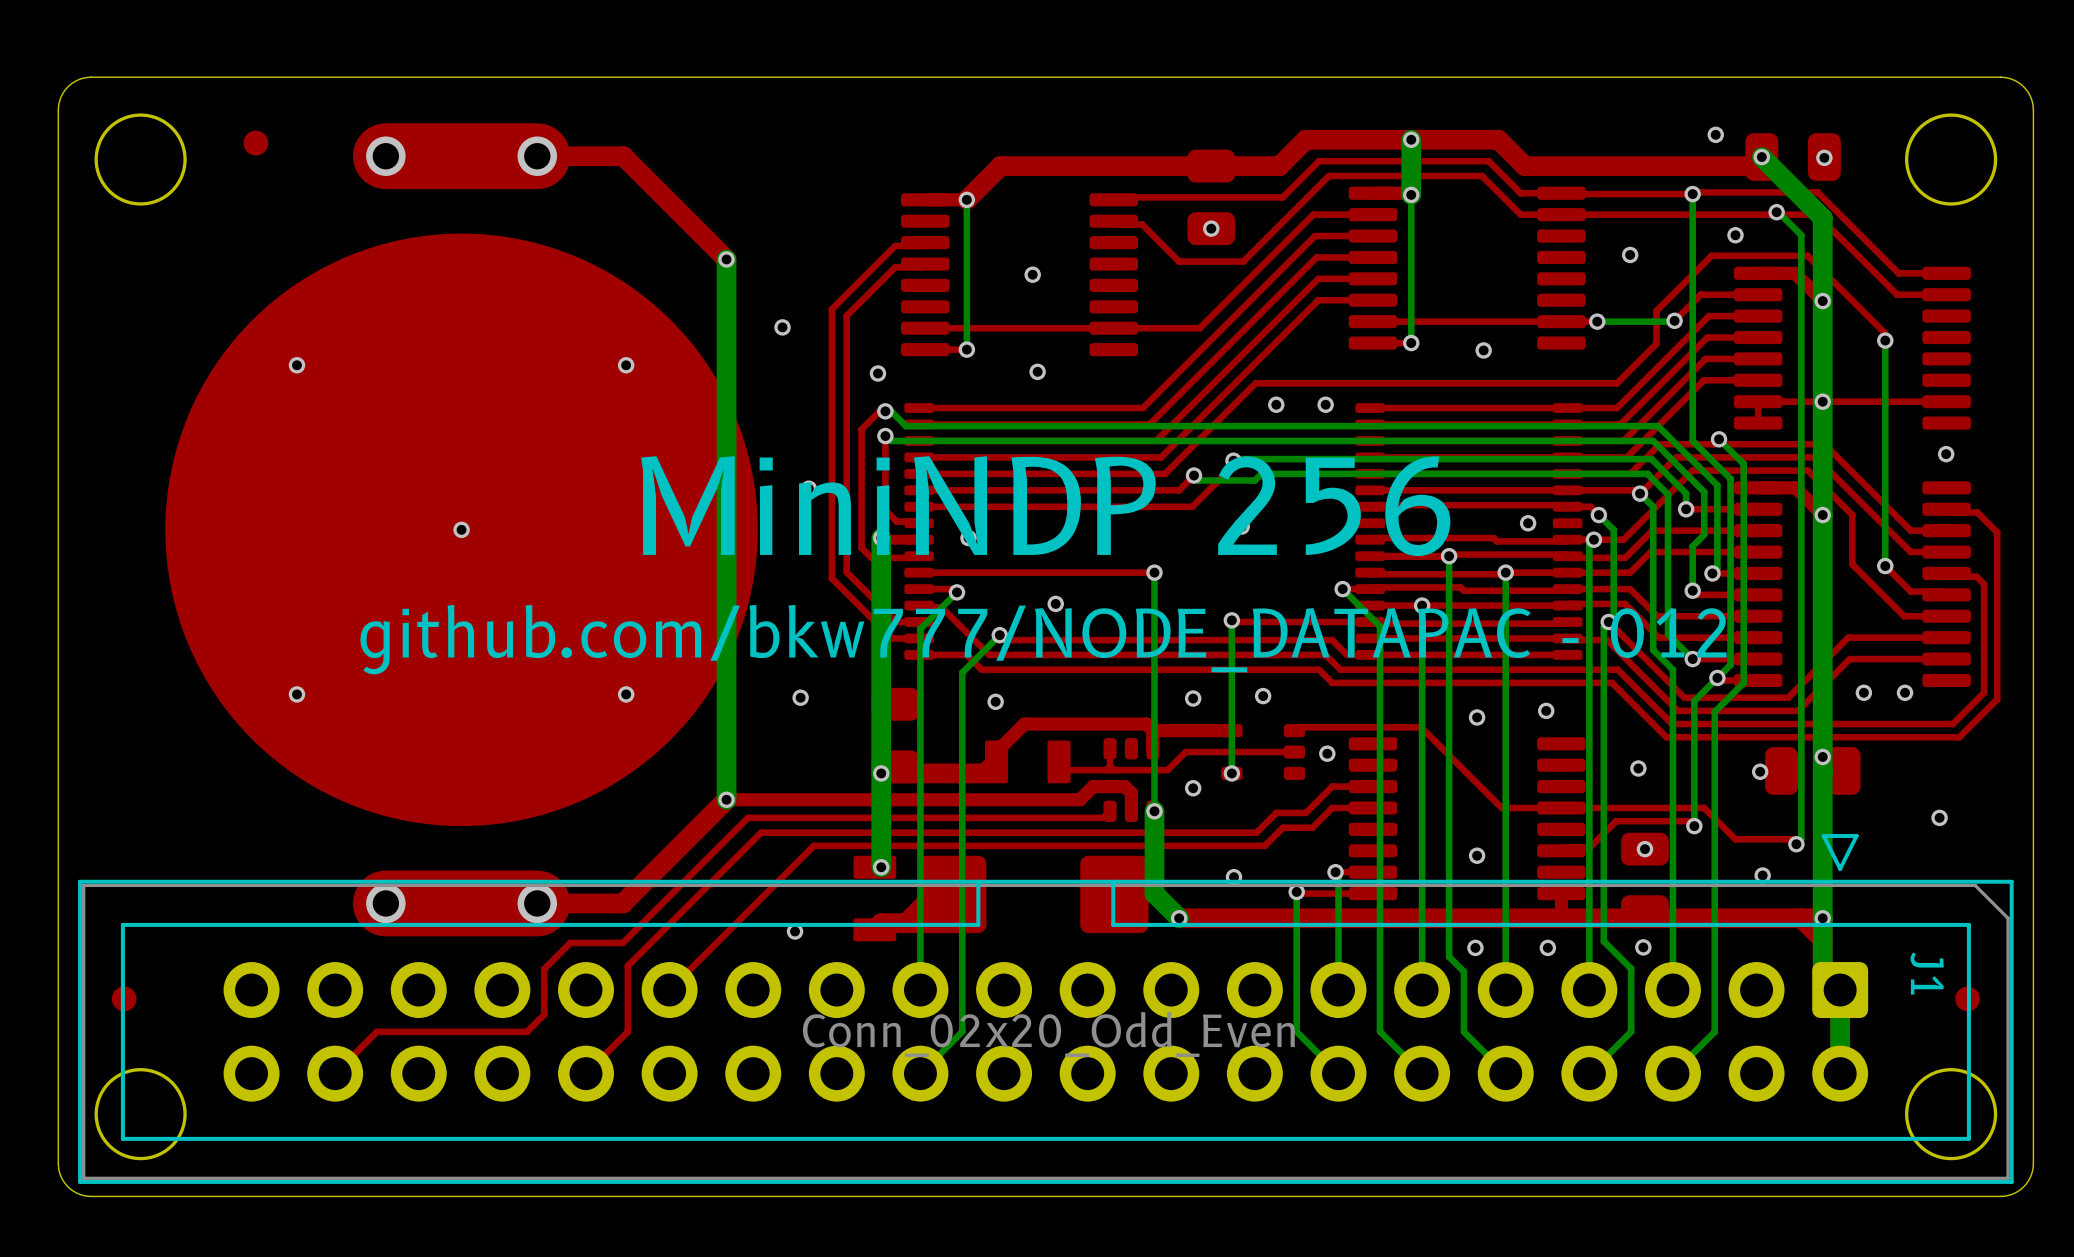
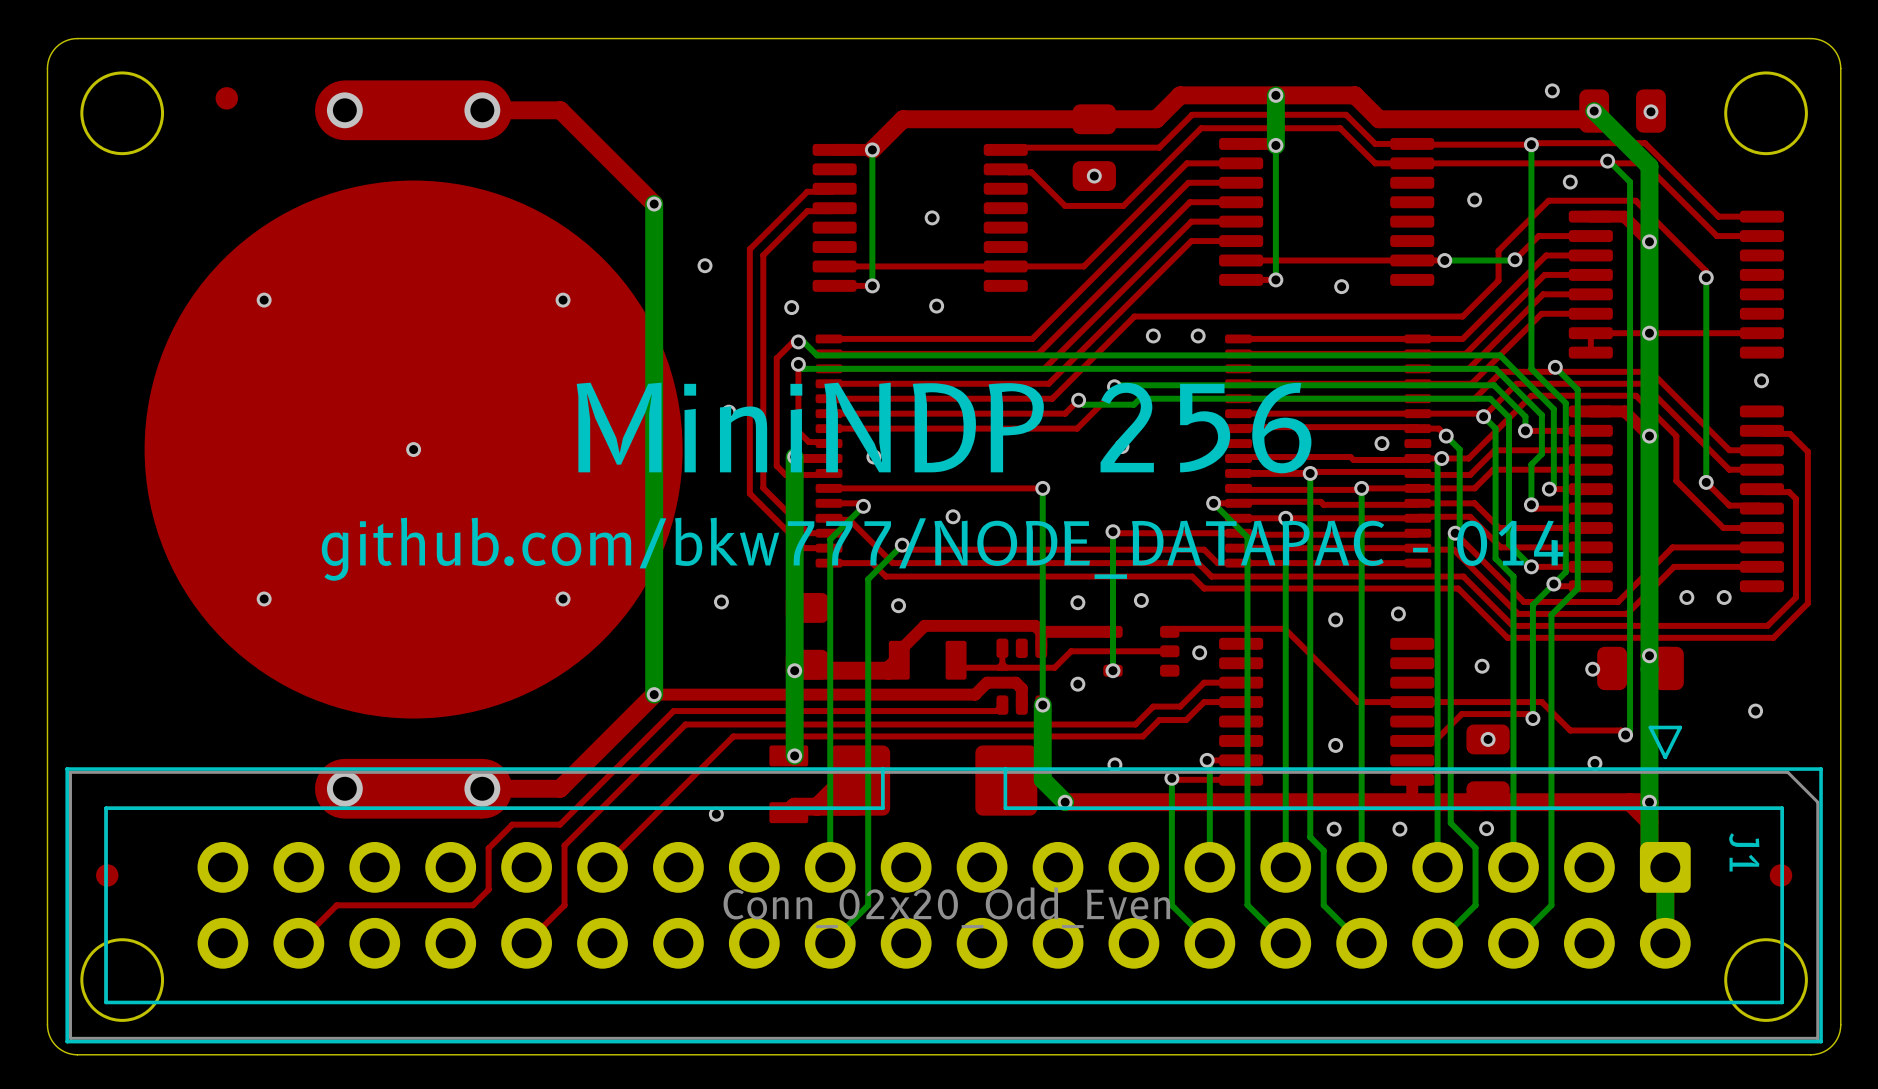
text: github.com/bkw777/NODE_DATAPAC - 012 (1043, 639) -> github.com/bkw777/NODE_DATAPAC - 014 (942, 549)

